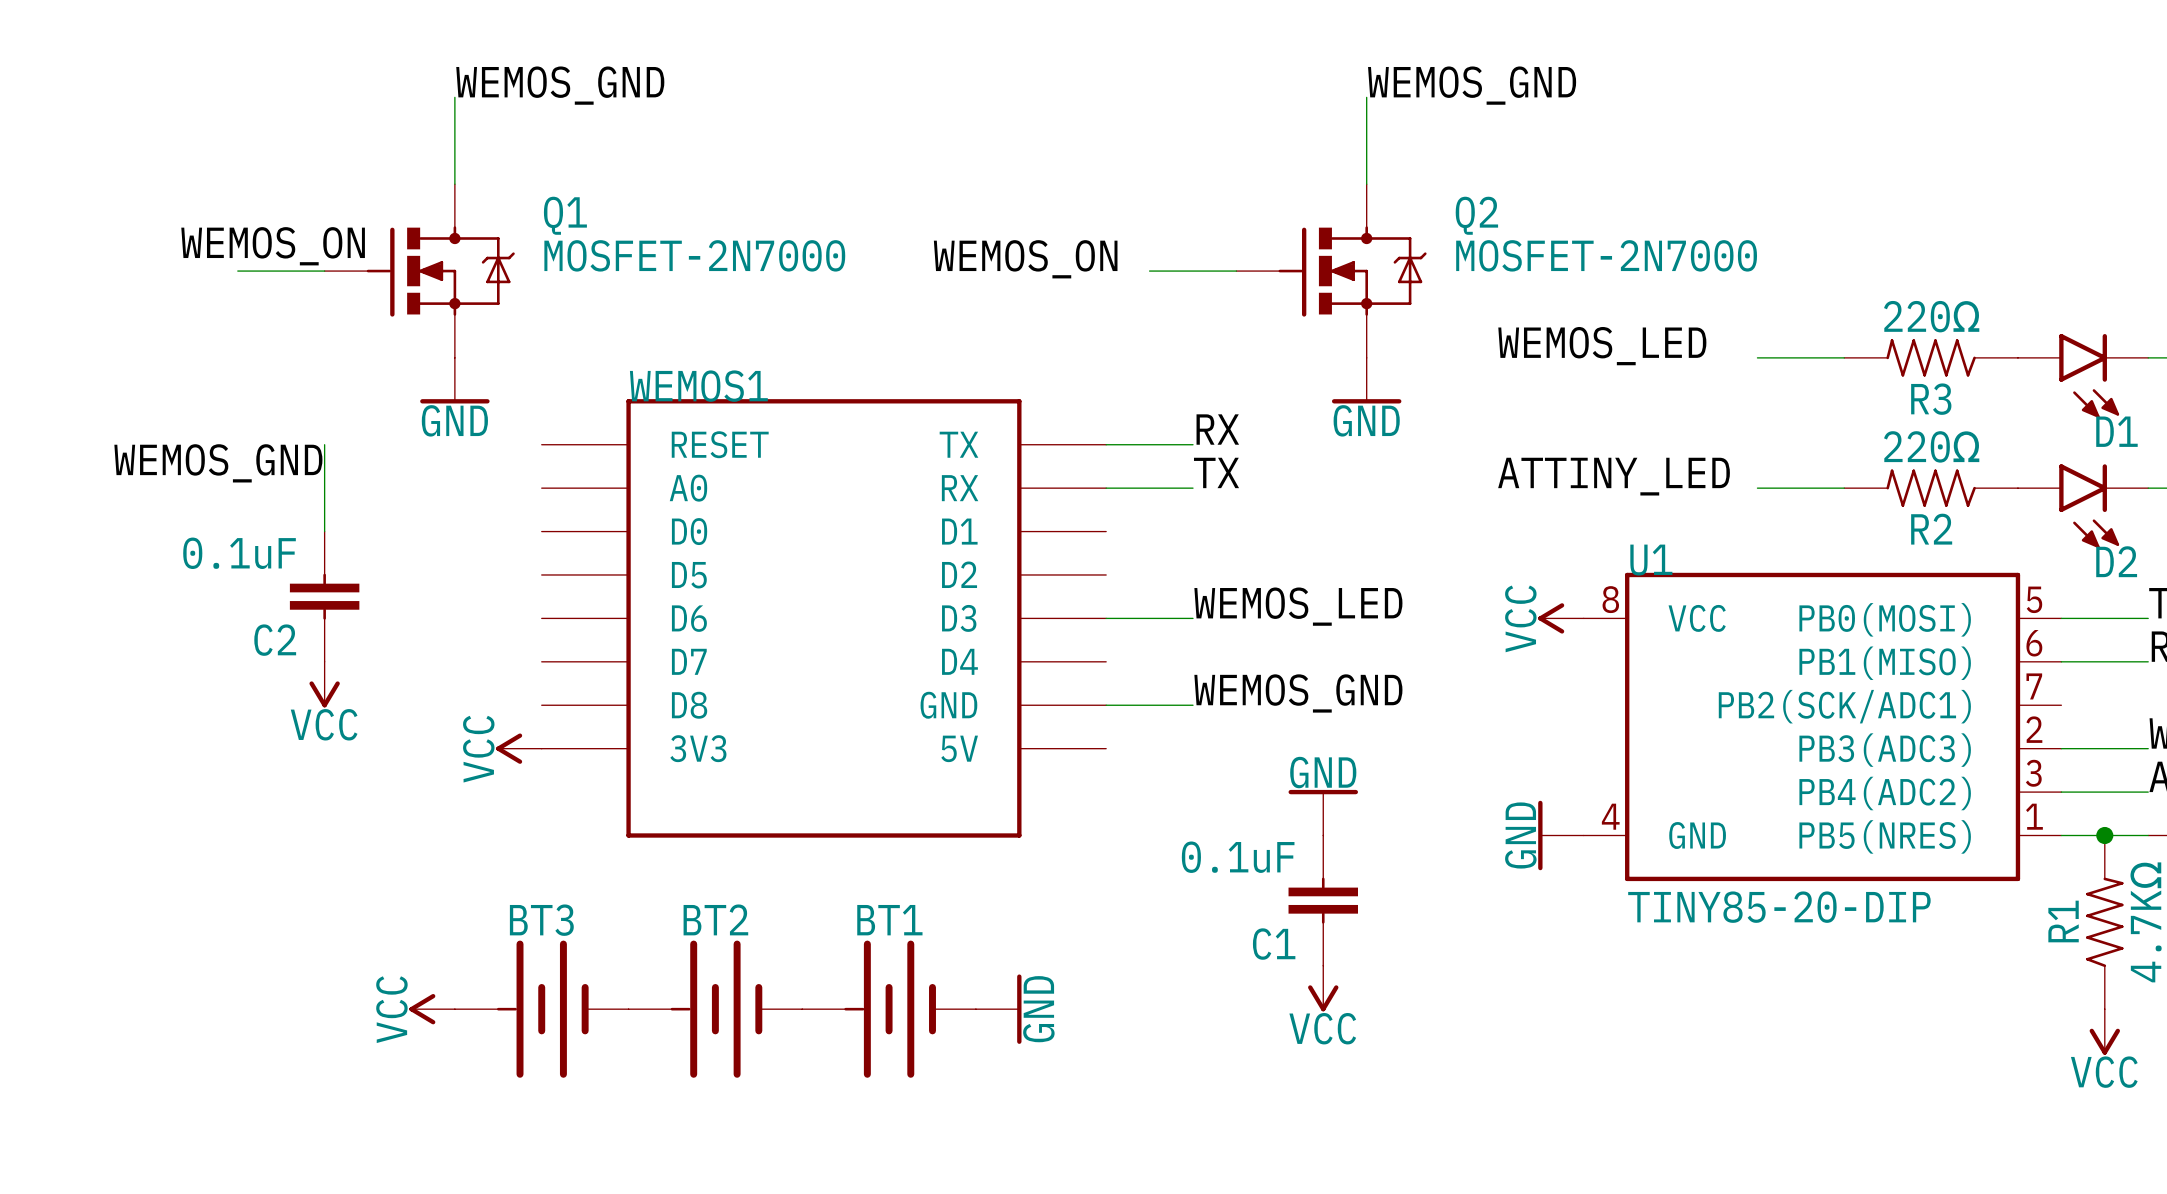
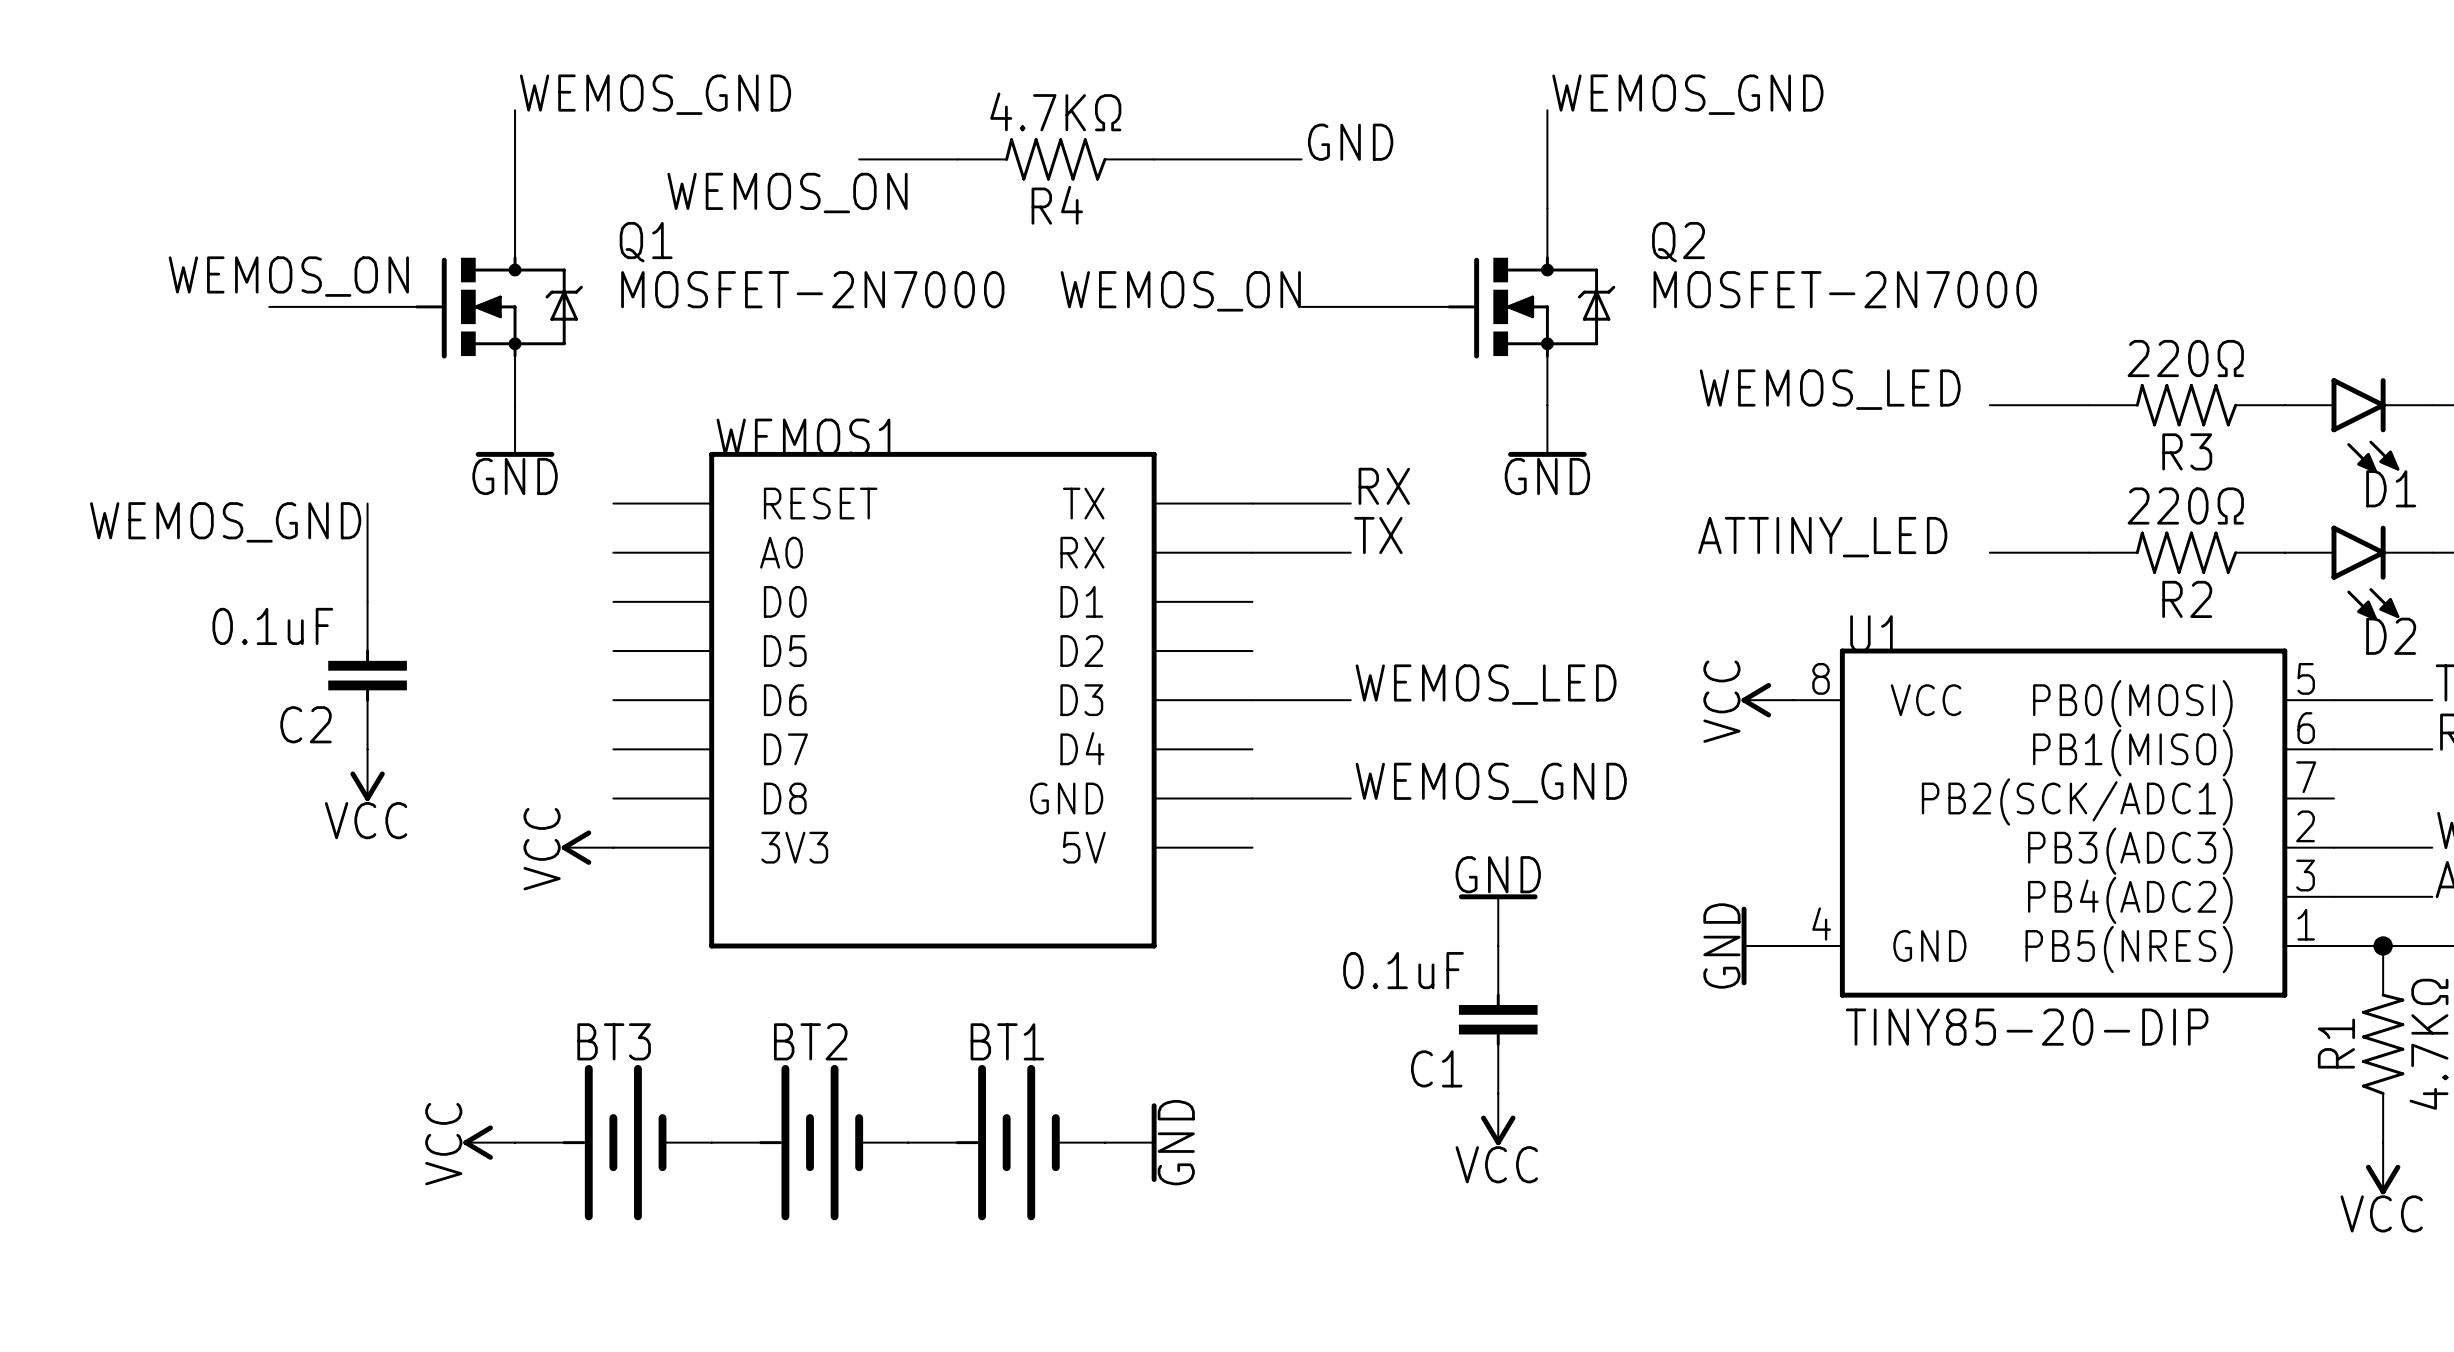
label: none -> GND (1350, 142)
wire: none -> (859, 159) (957, 159)
R4: none -> 4.7KΩ (1055, 159)
wire: none -> (1154, 159) (1301, 159)
label: none -> WEMOS_ON (787, 193)

